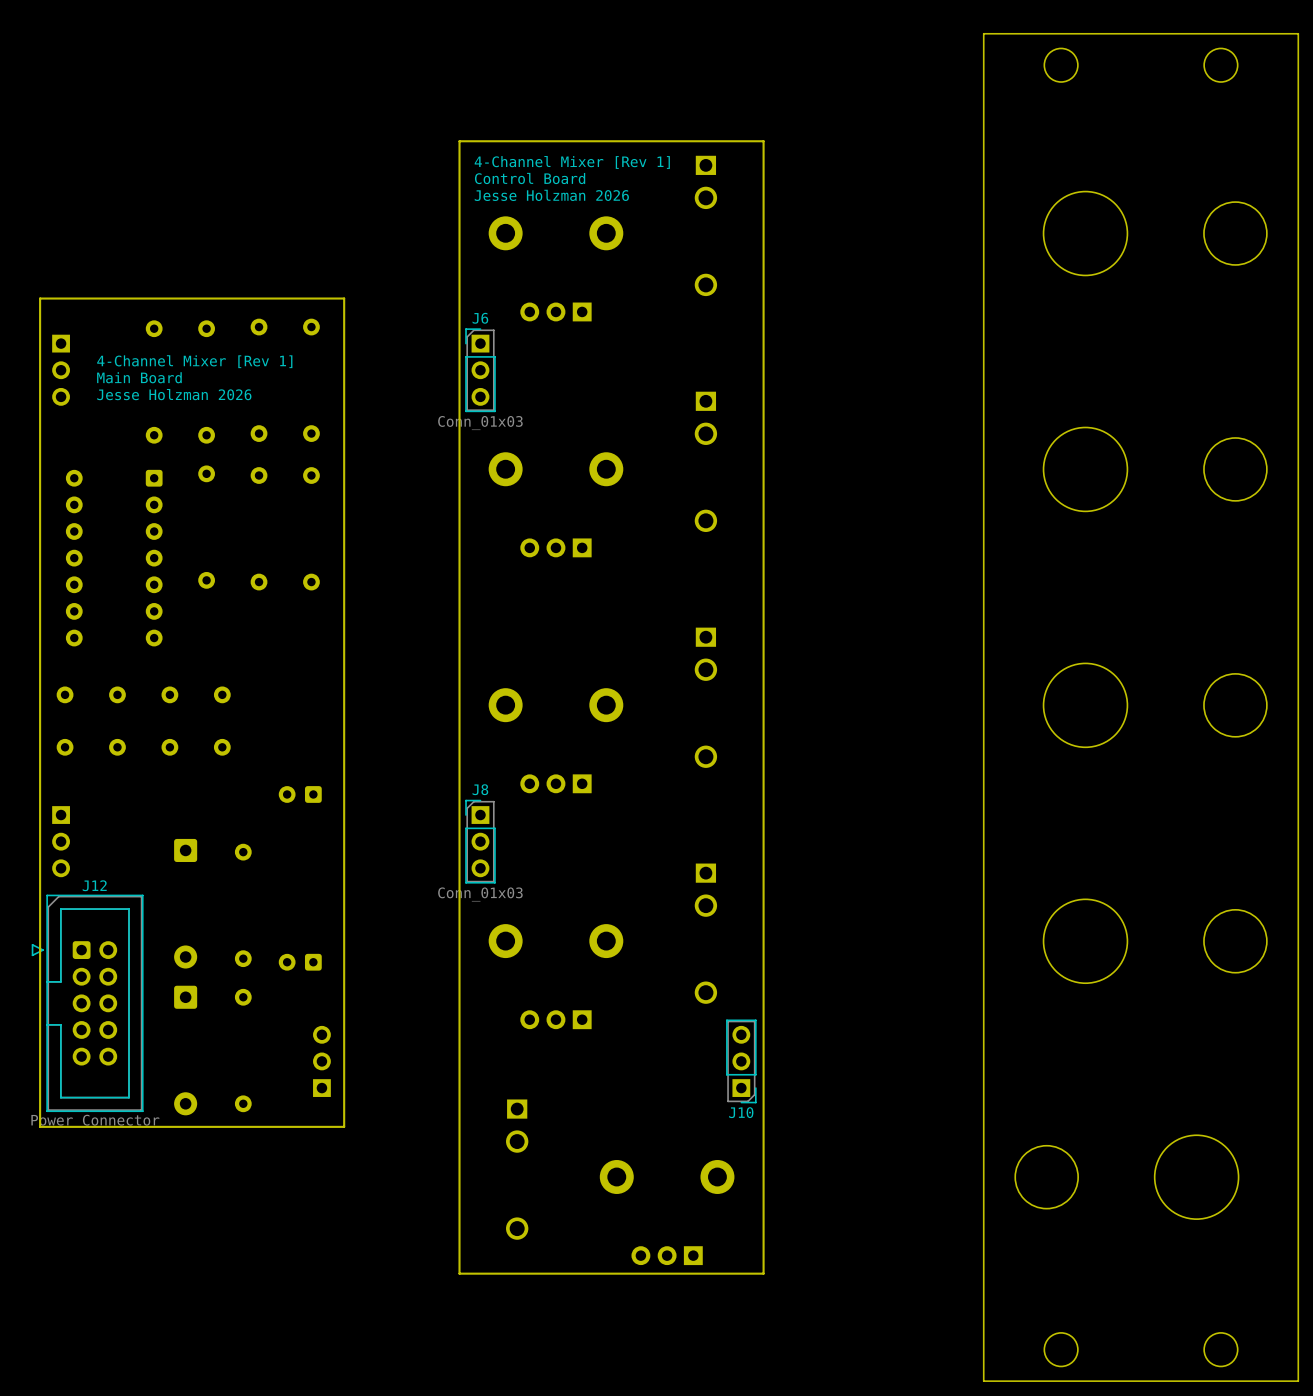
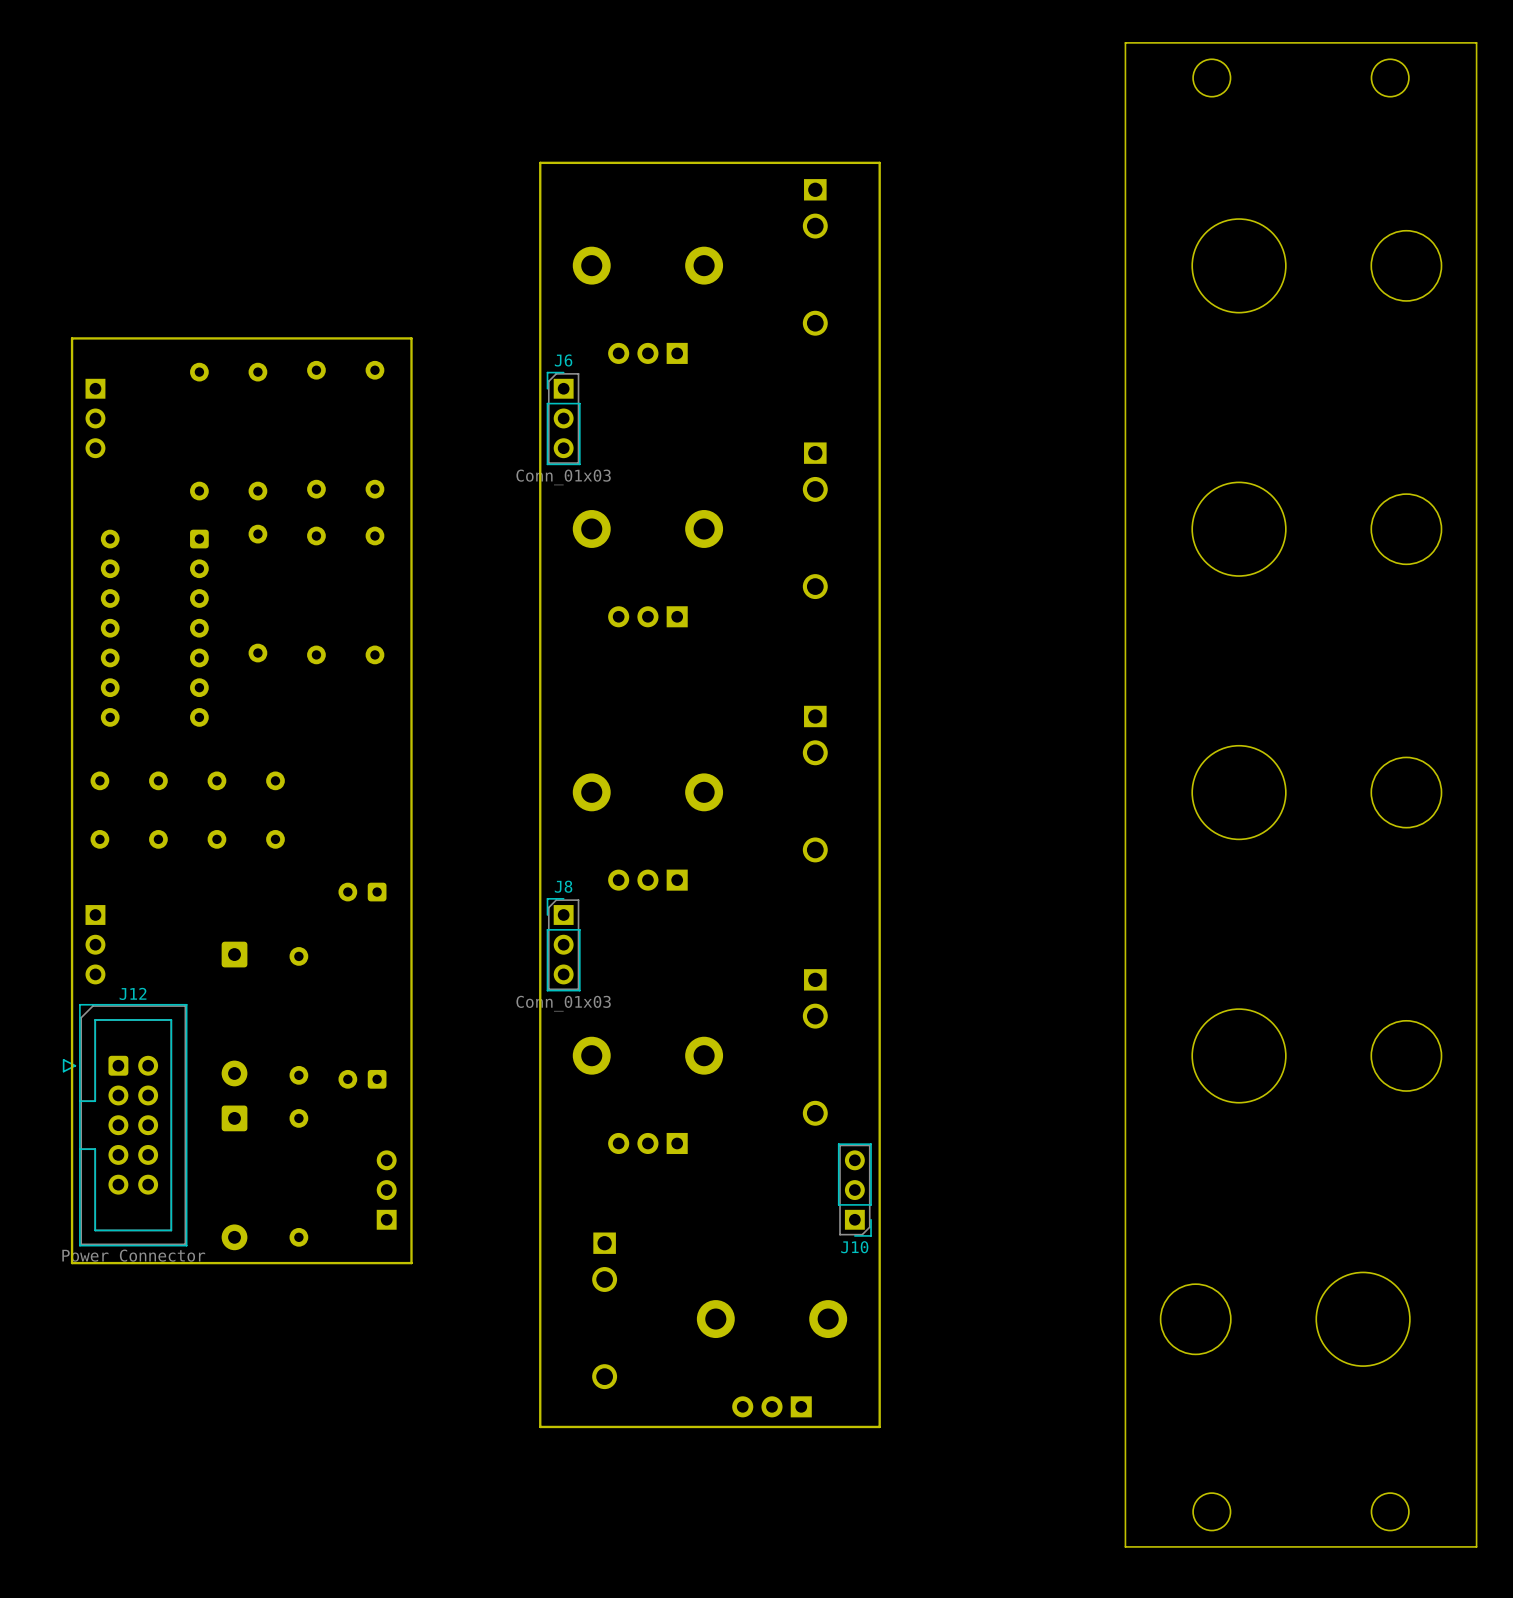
text: 4-Channel Mixer [Rev 1] (572, 162) -> none
text: Control Board (530, 178) -> none
text: Jesse Holzman 2026 (551, 195) -> none
text: 4-Channel Mixer [Rev 1] (194, 361) -> none
text: Main Board (139, 377) -> none
text: Jesse Holzman 2026 (174, 394) -> none

